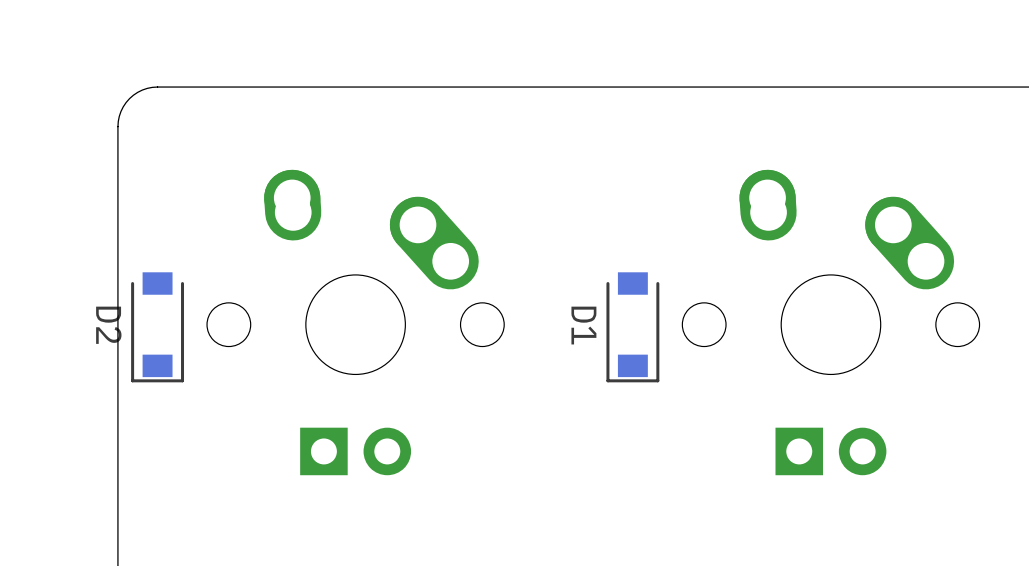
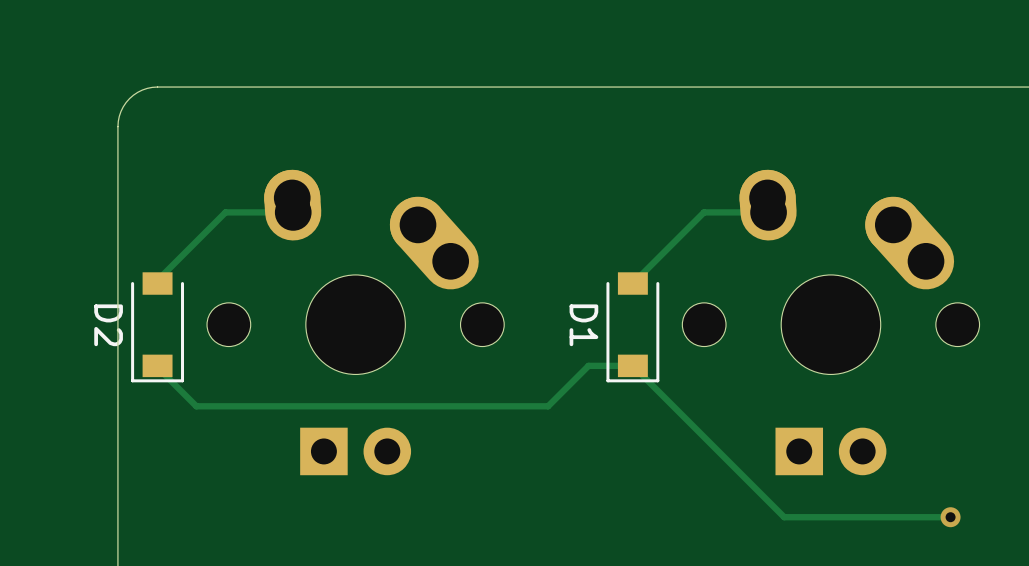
track: none -> (292, 197) (277, 212) (225, 212) (155, 282)
track: none -> (767, 197) (753, 212) (704, 212) (632, 283)
track: none -> (155, 365) (196, 406) (548, 406) (588, 365) (632, 365) (784, 517) (950, 517)
via: none -> (950, 517)

